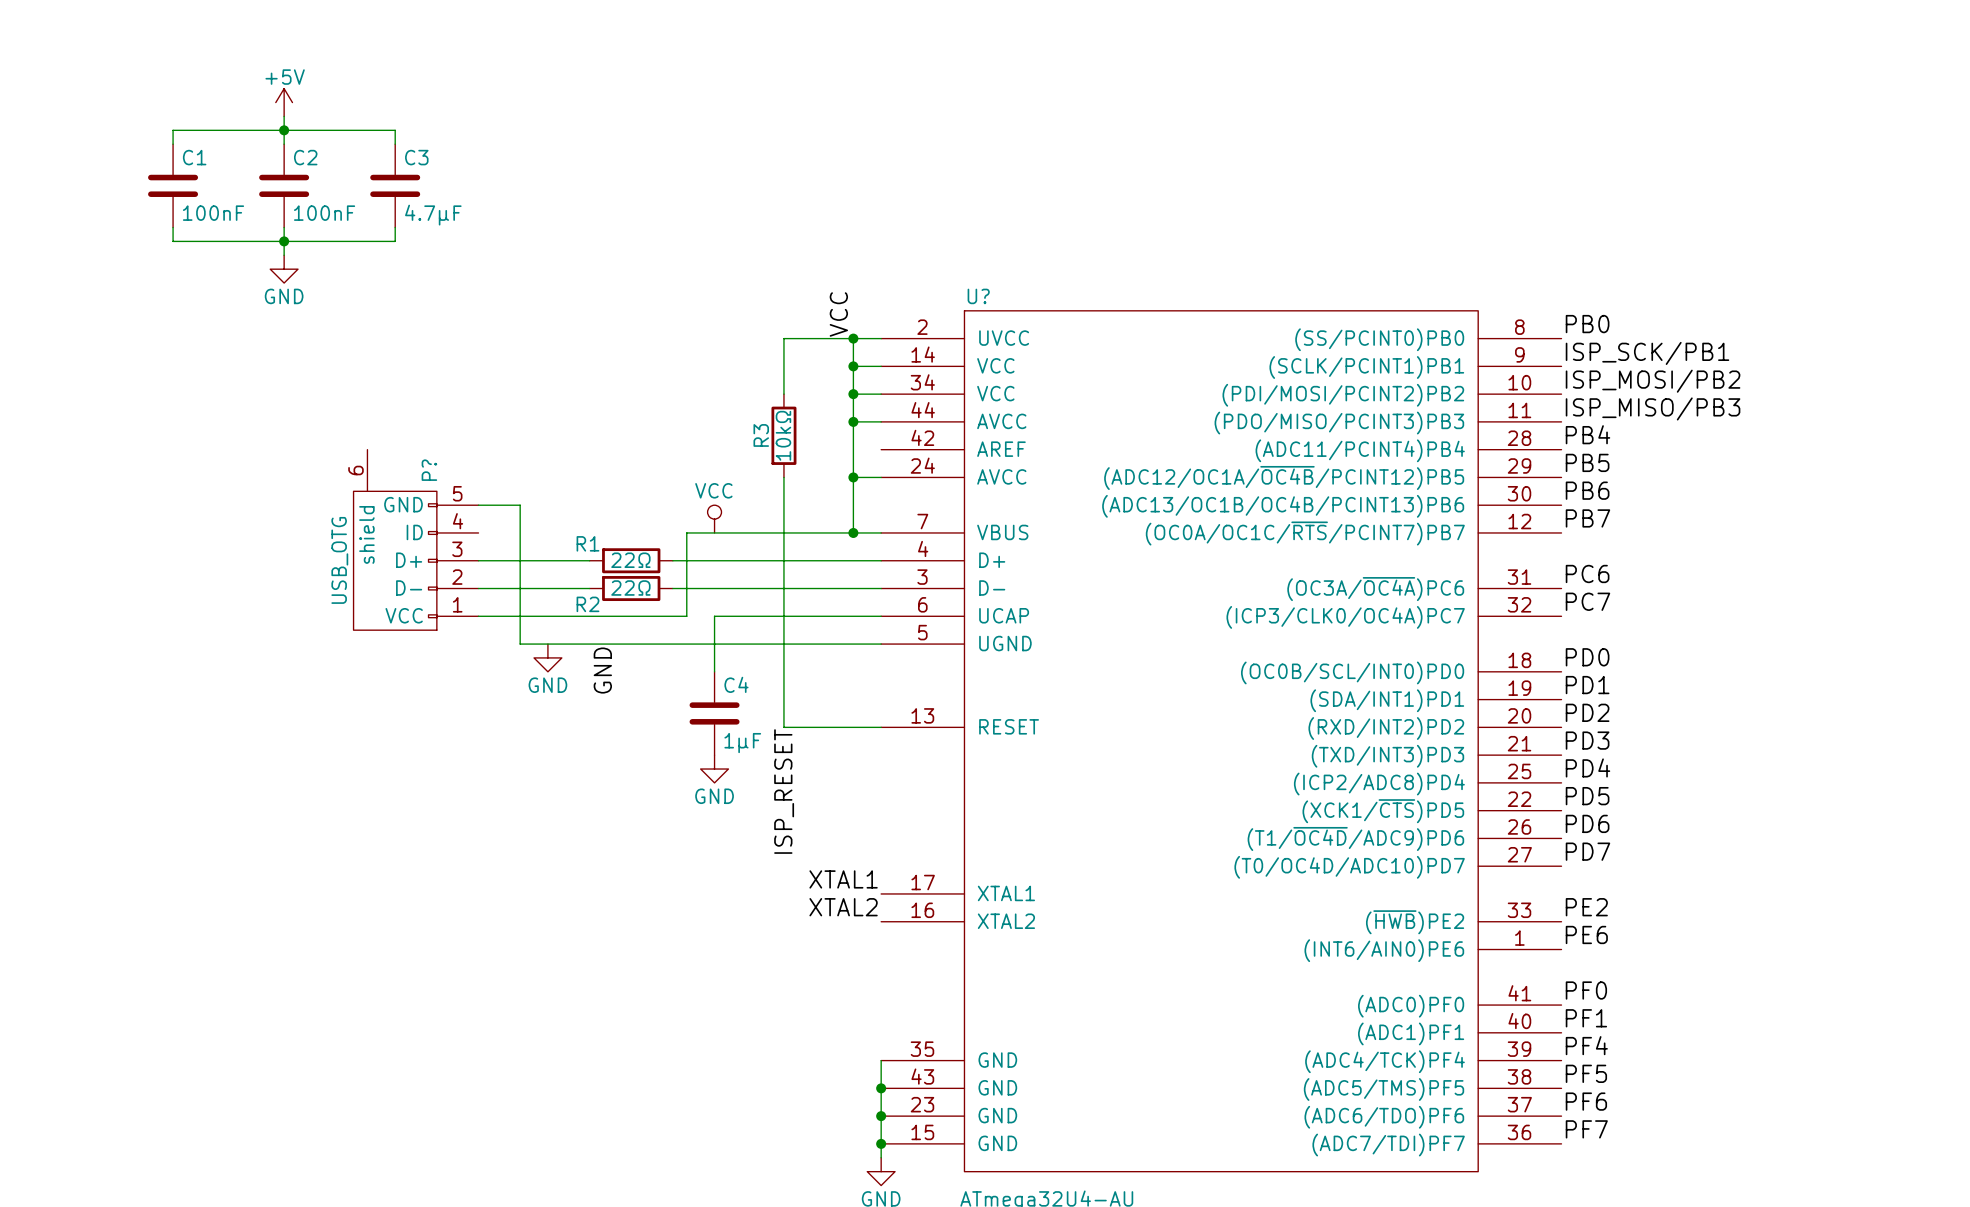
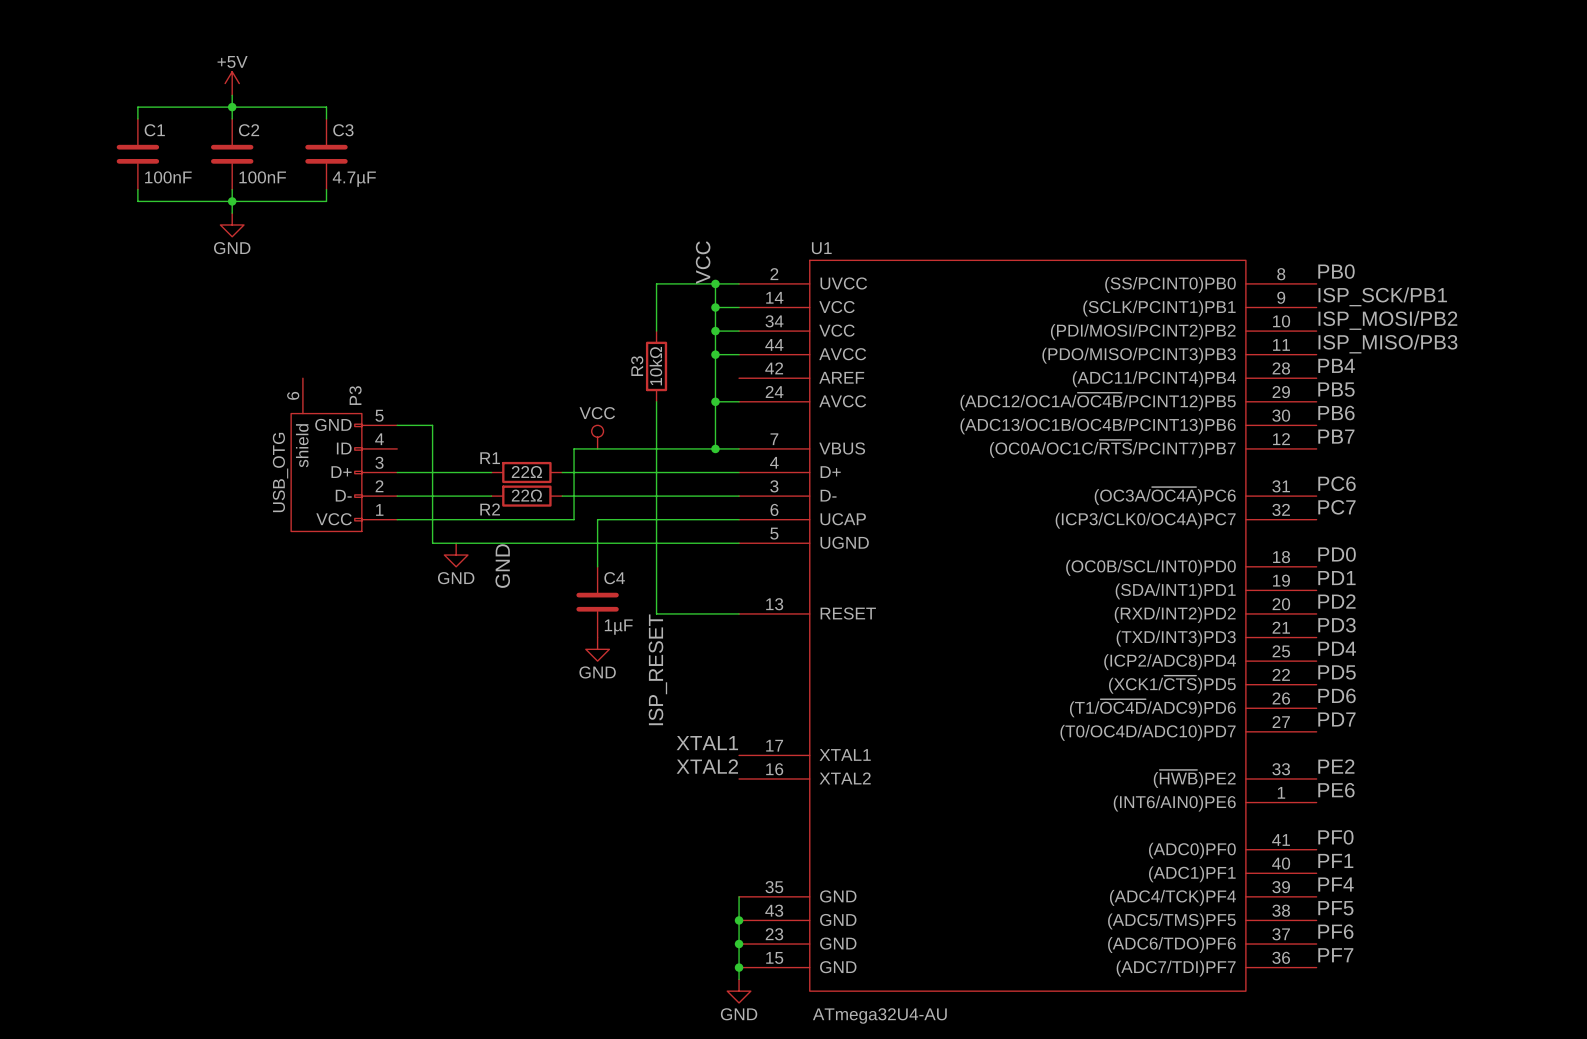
U? name: U? (978, 296) -> U1 (821, 248)
P? name: P? (429, 470) -> P3 (355, 395)

